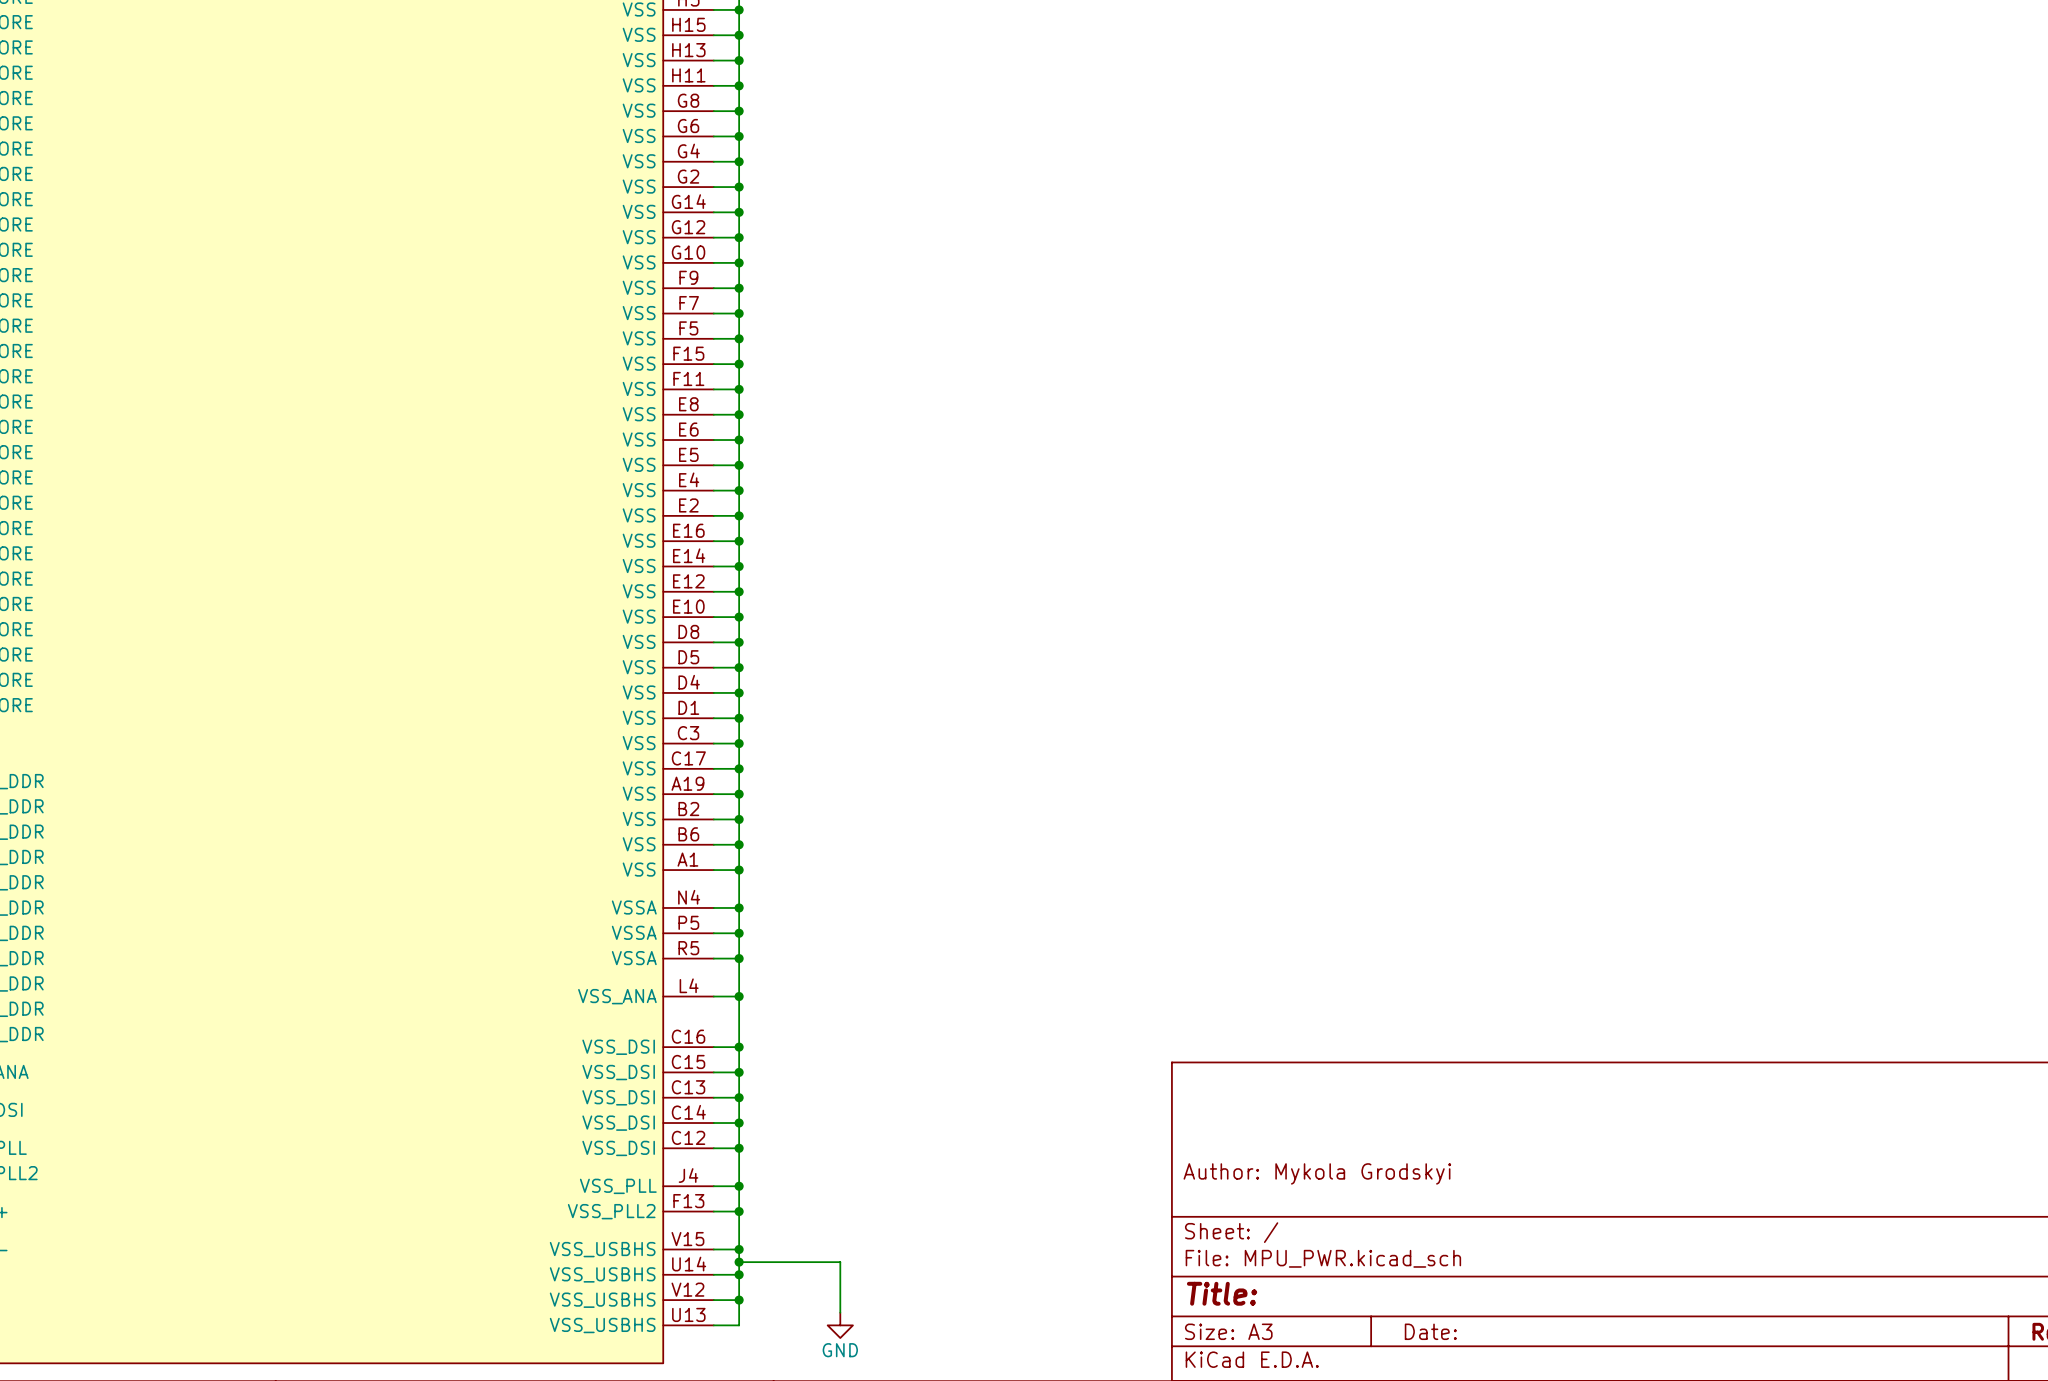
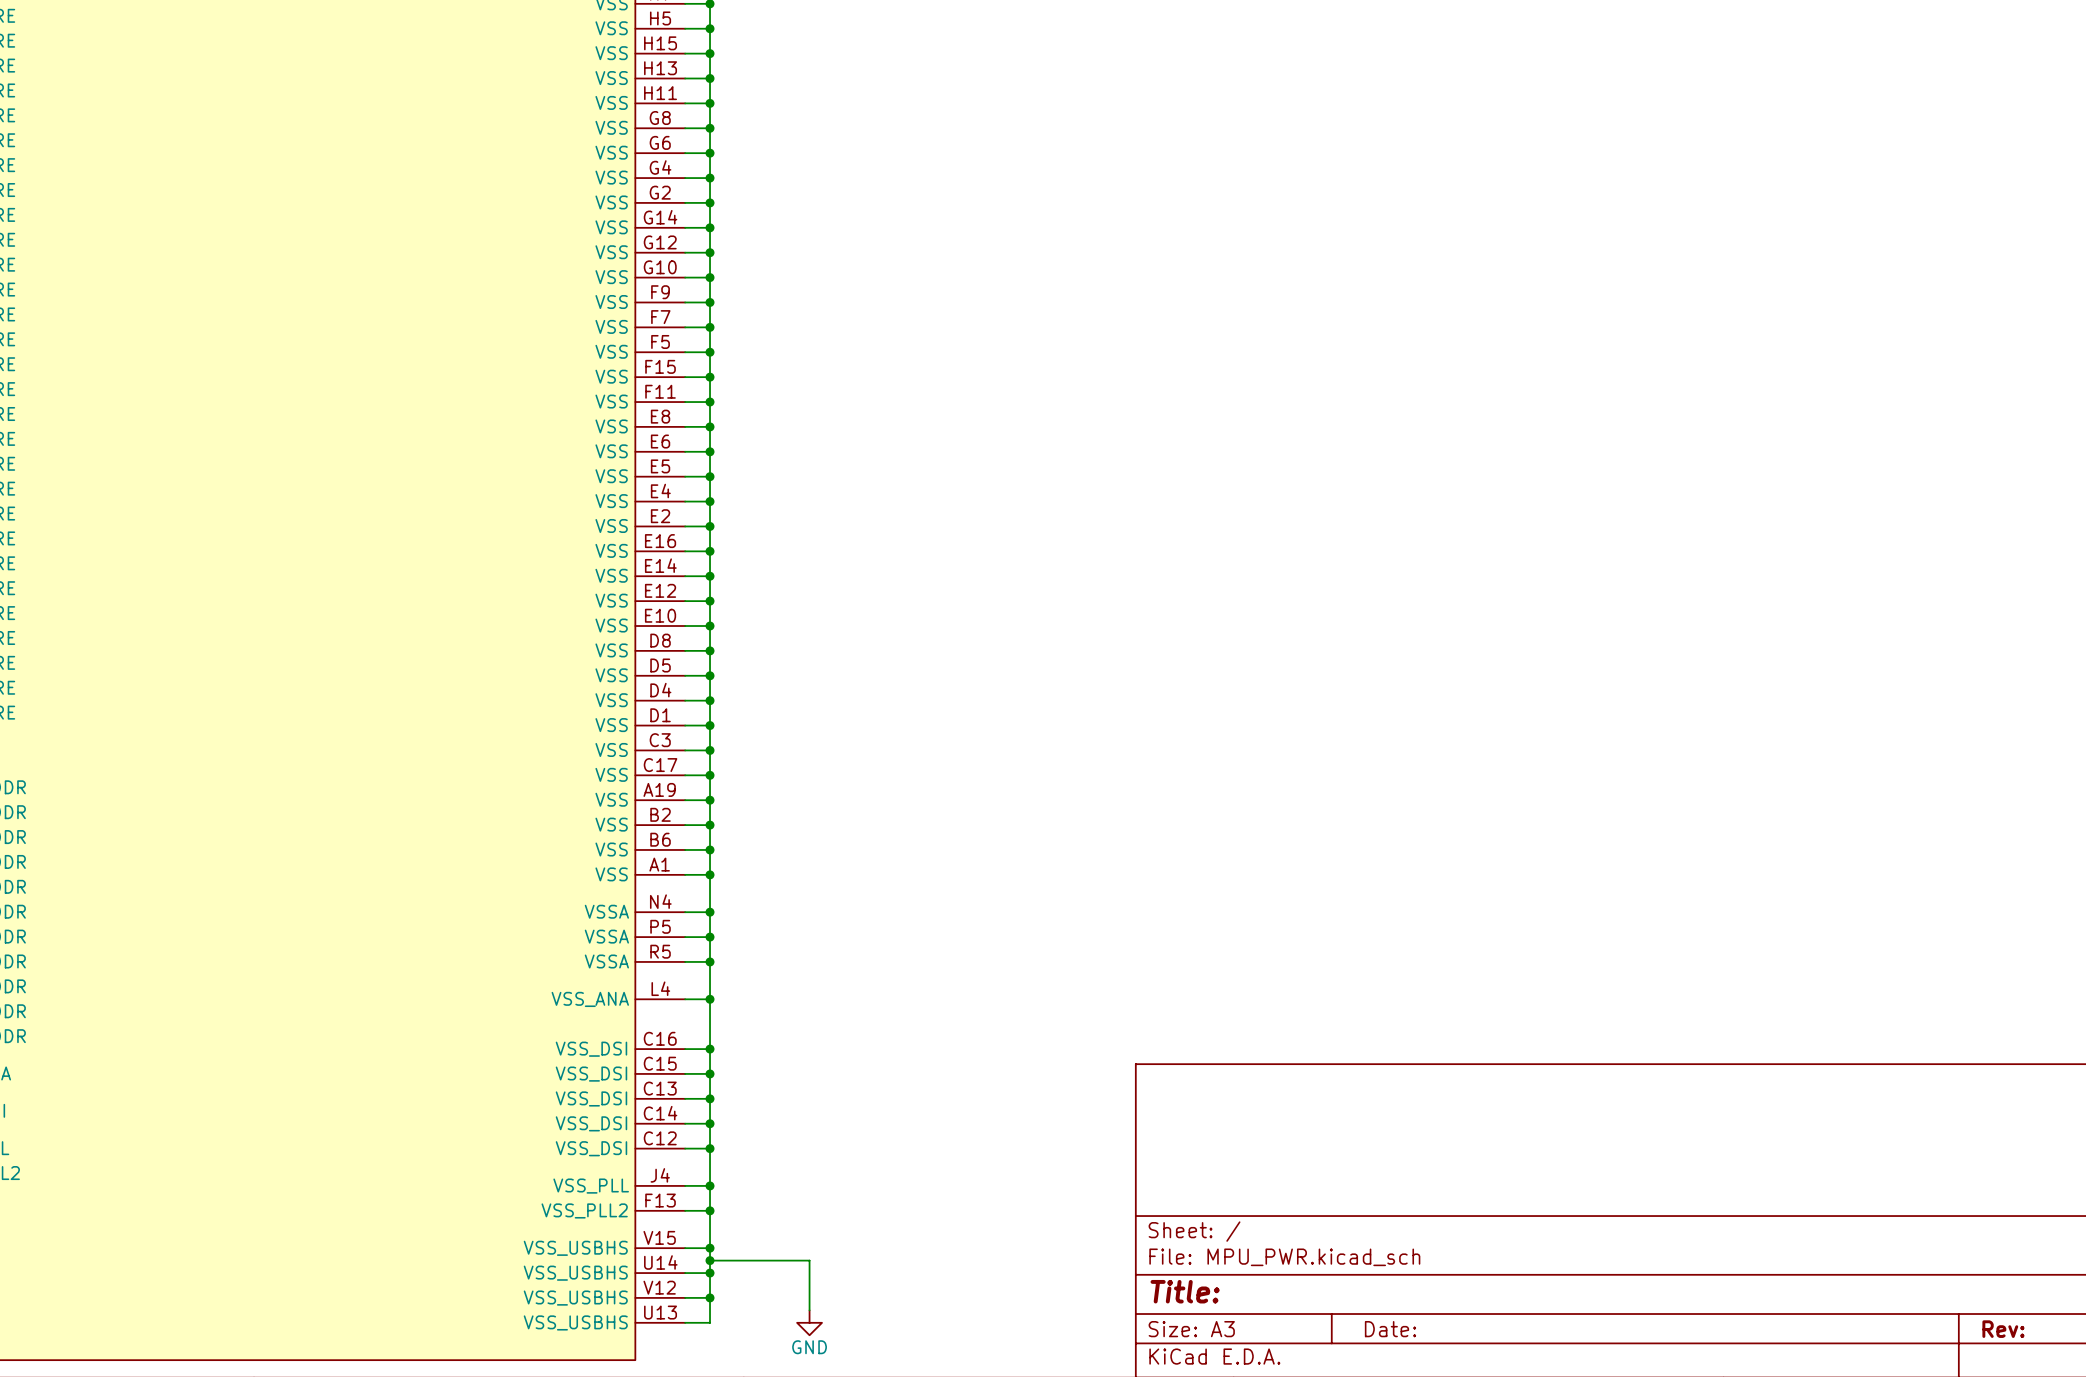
title block: Author: Mykola Grodskyi (1317, 1173) -> none

